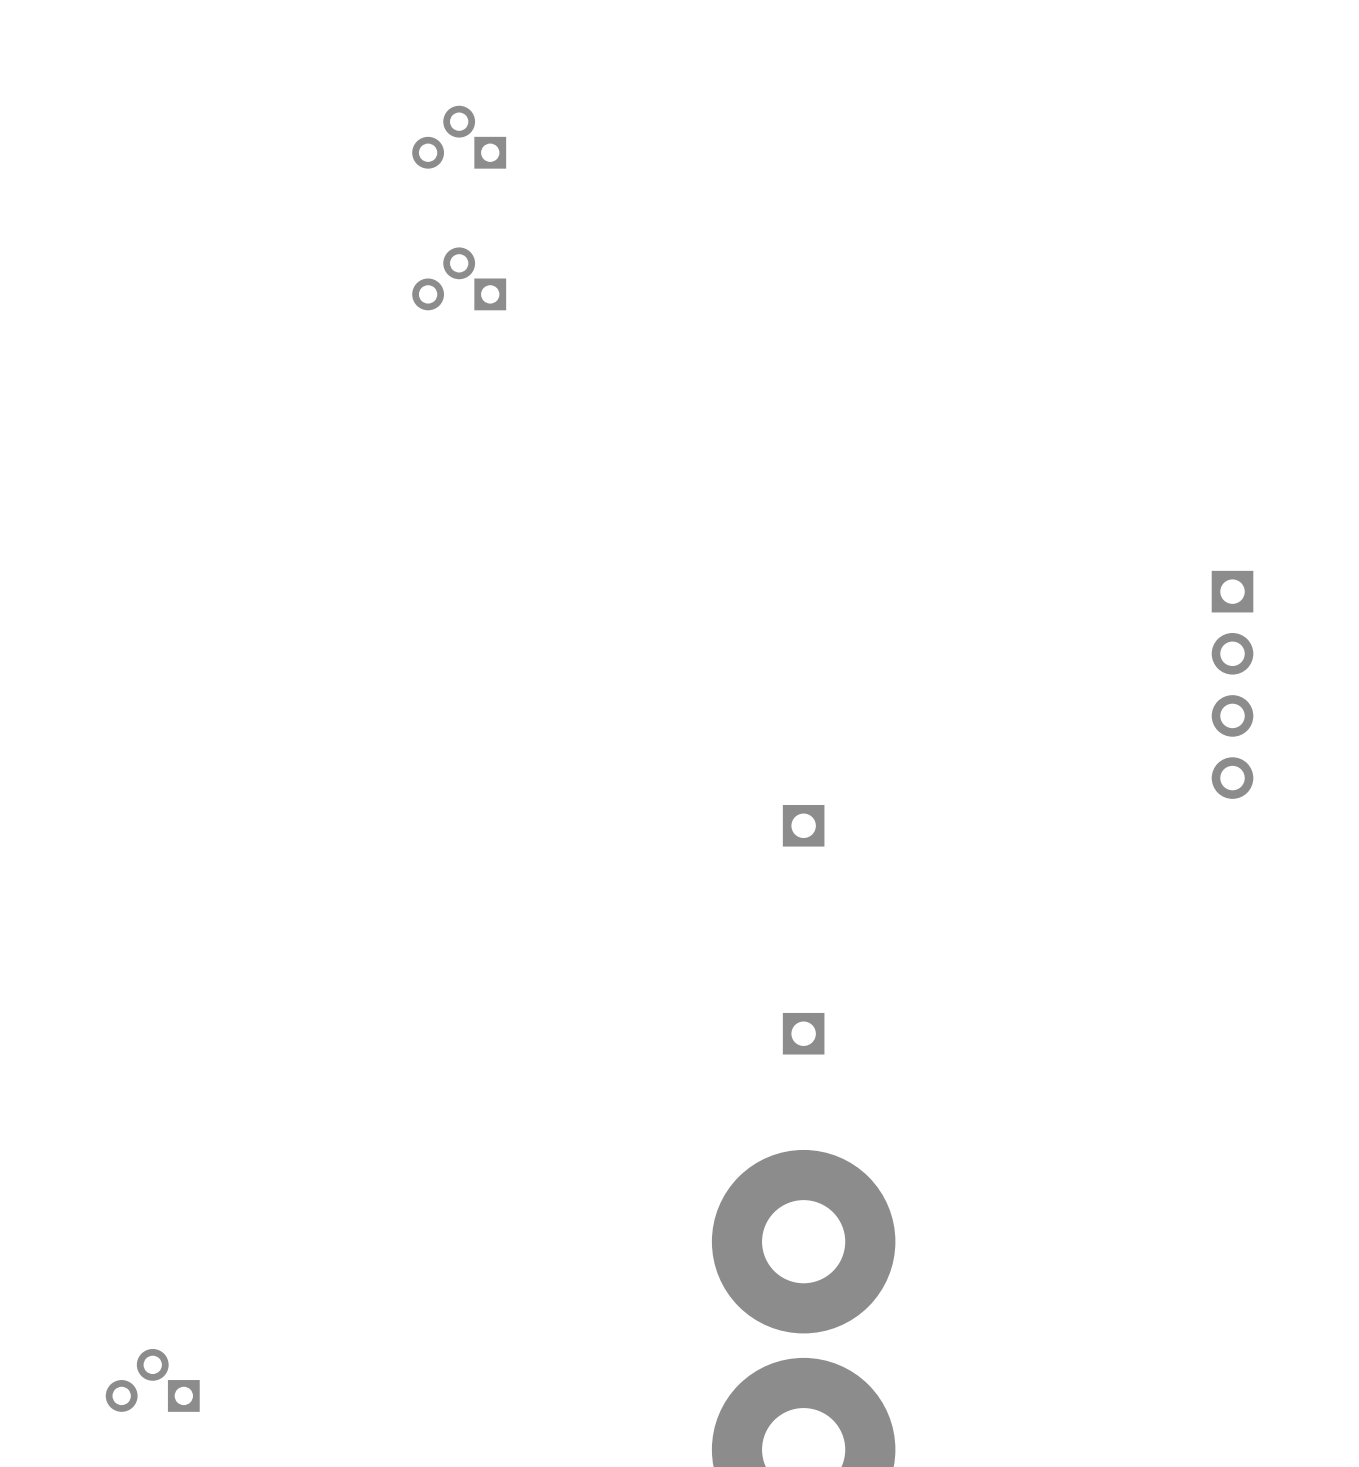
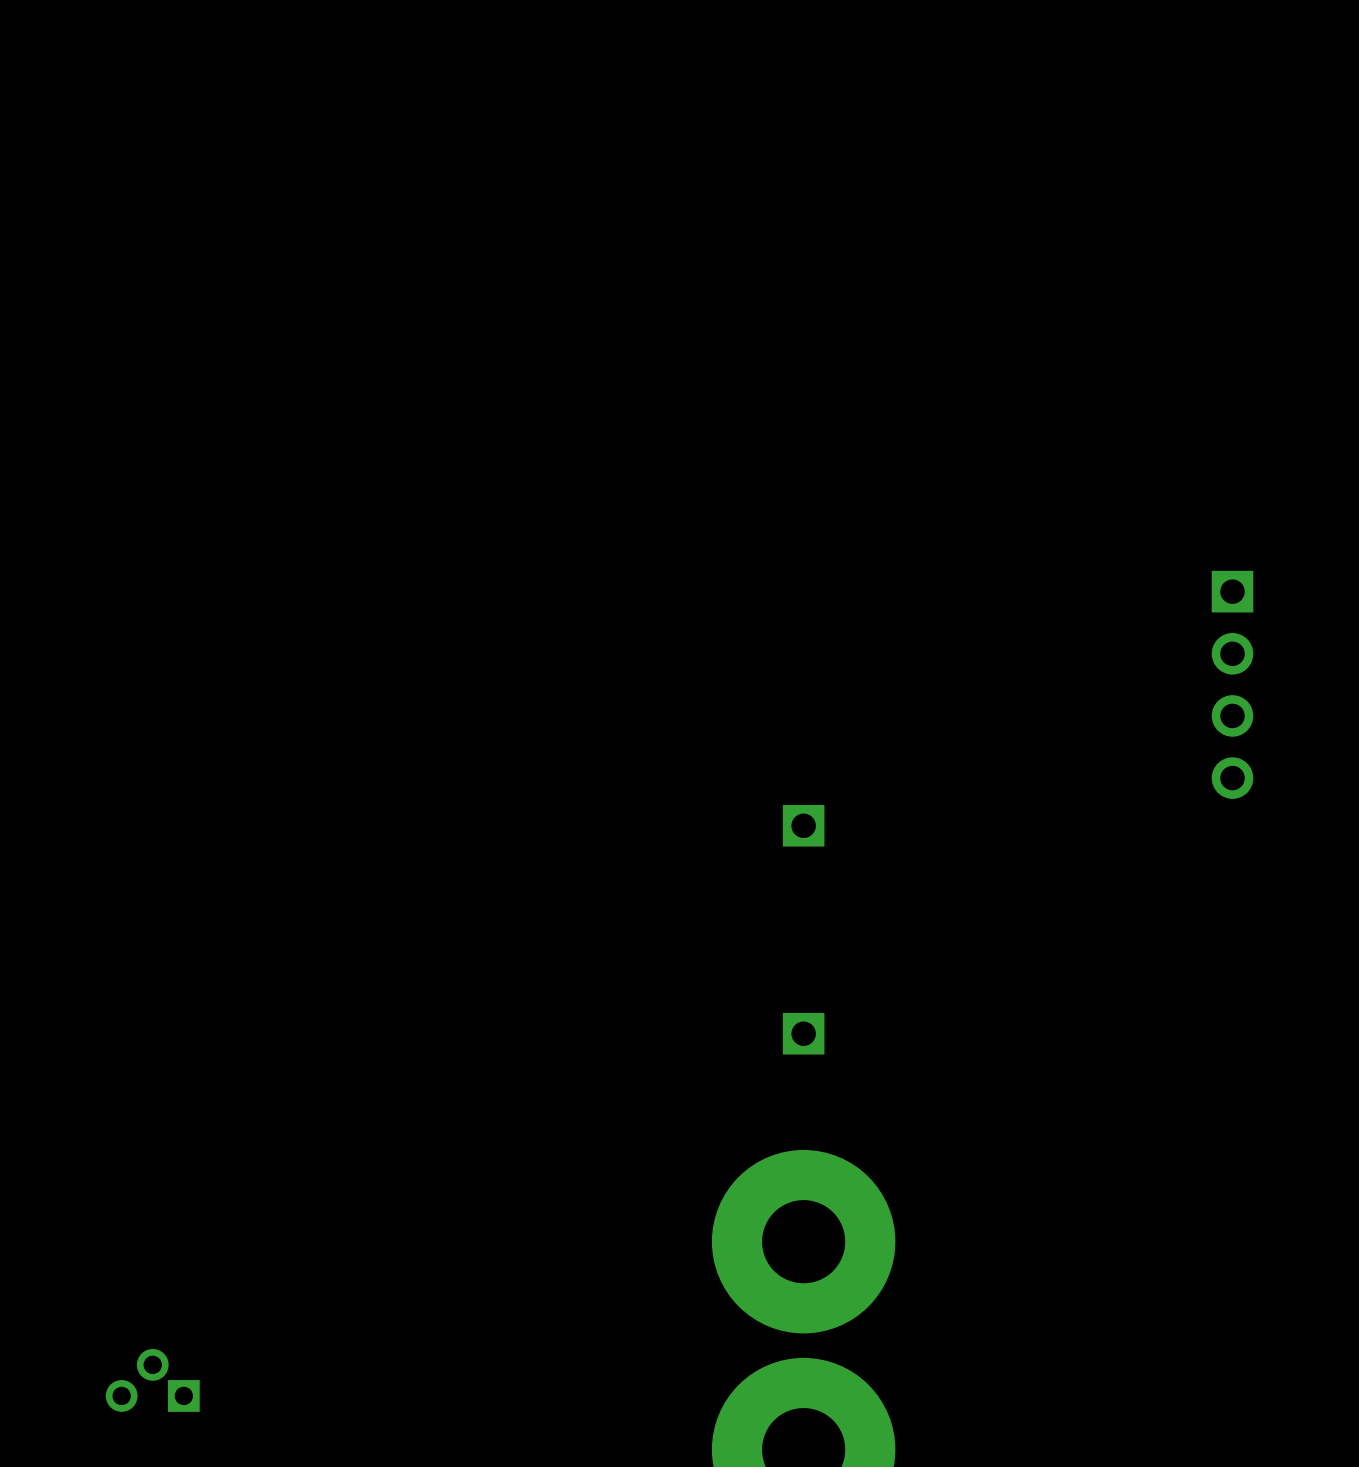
part: (459, 137) -> none
part: (459, 278) -> none

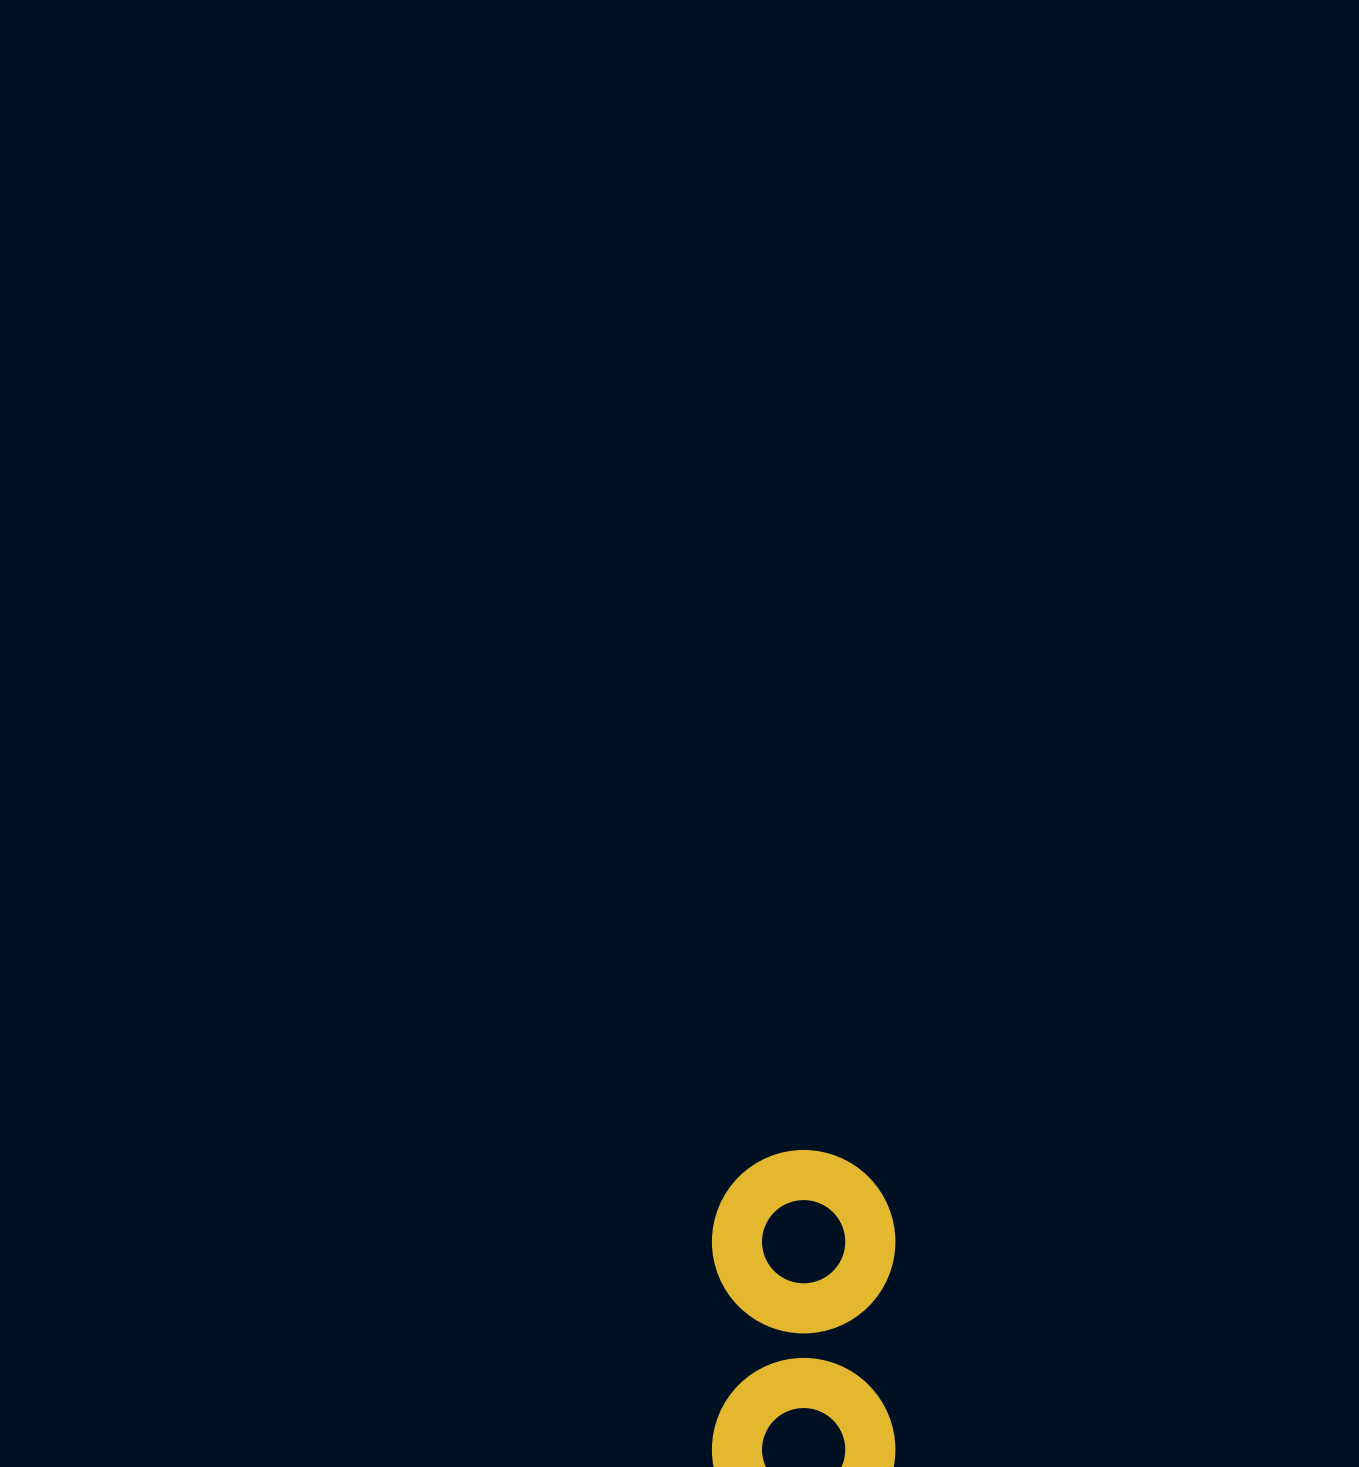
part: (1232, 684) -> none
part: (803, 825) -> none
part: (803, 1033) -> none
part: (152, 1380) -> none

